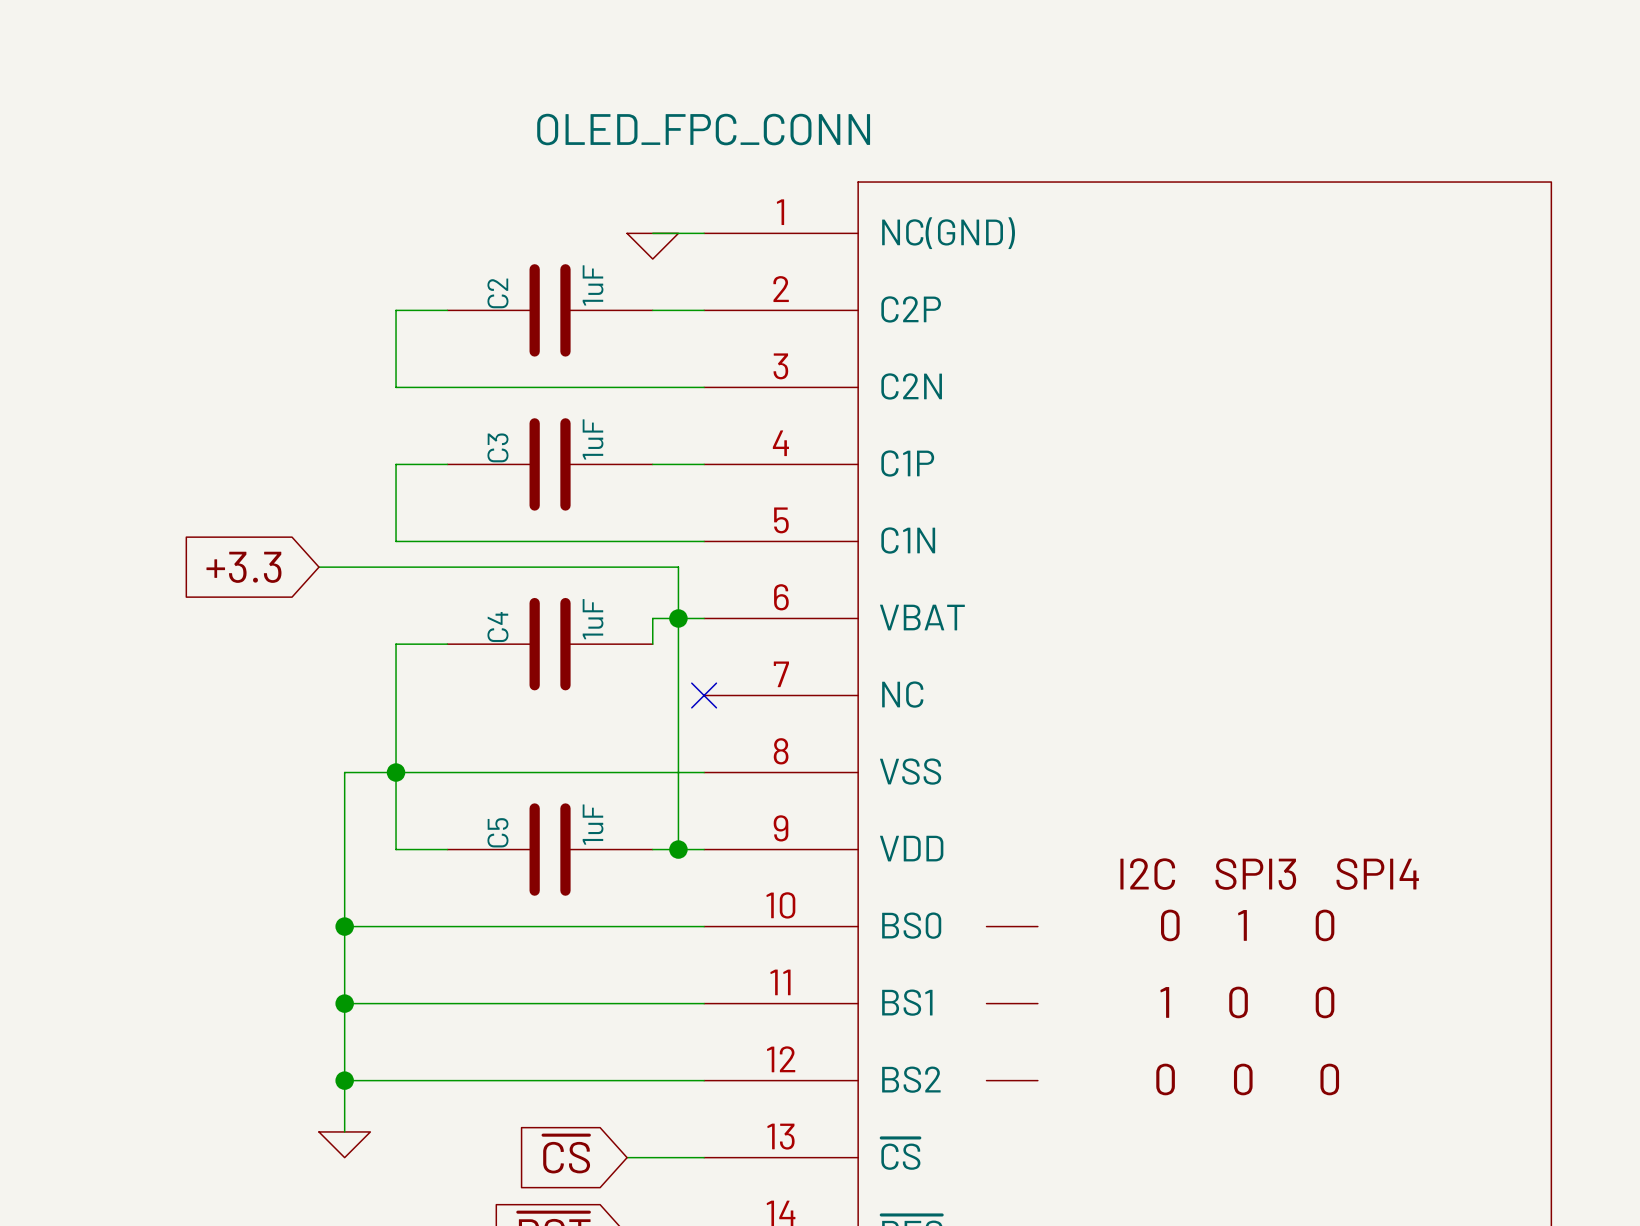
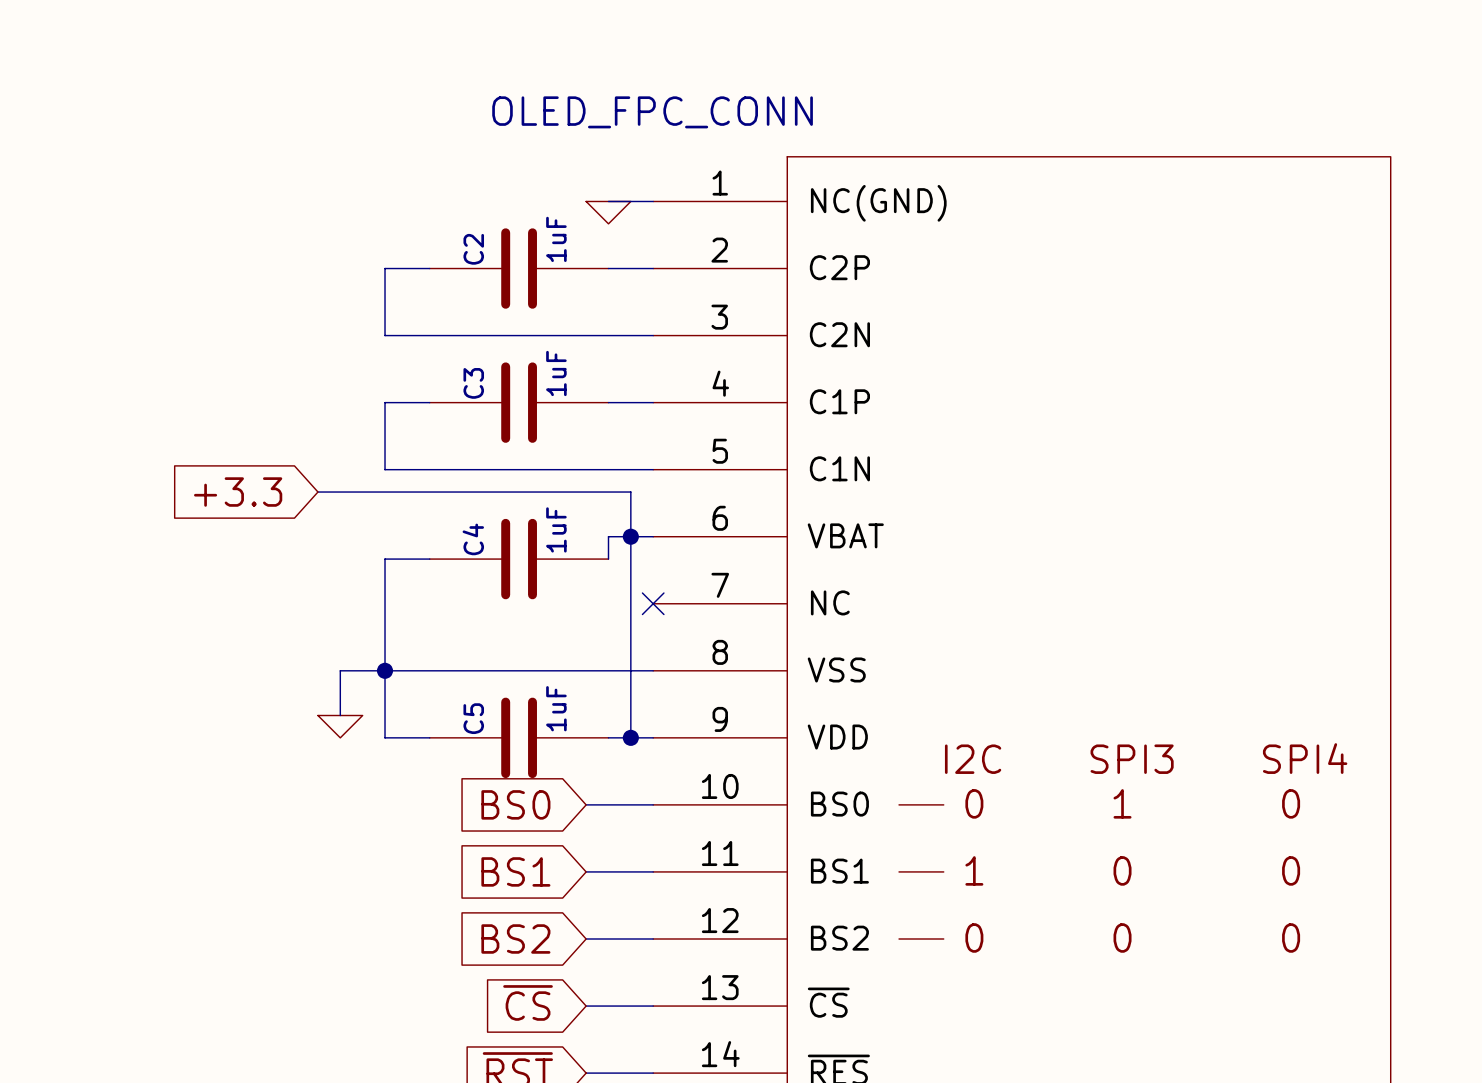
wire: (344, 823) (344, 1131) -> none
wire: (344, 926) (627, 926) -> none
junction: (344, 926) -> none
global label: none -> BS0 (515, 804)
wire: (344, 1003) (627, 1003) -> none
junction: (344, 1003) -> none
global label: none -> BS1 (515, 871)
wire: (344, 1080) (627, 1080) -> none
junction: (344, 1080) -> none
global label: none -> BS2 (515, 938)
power symbol position: (344, 1144) -> (340, 726)

